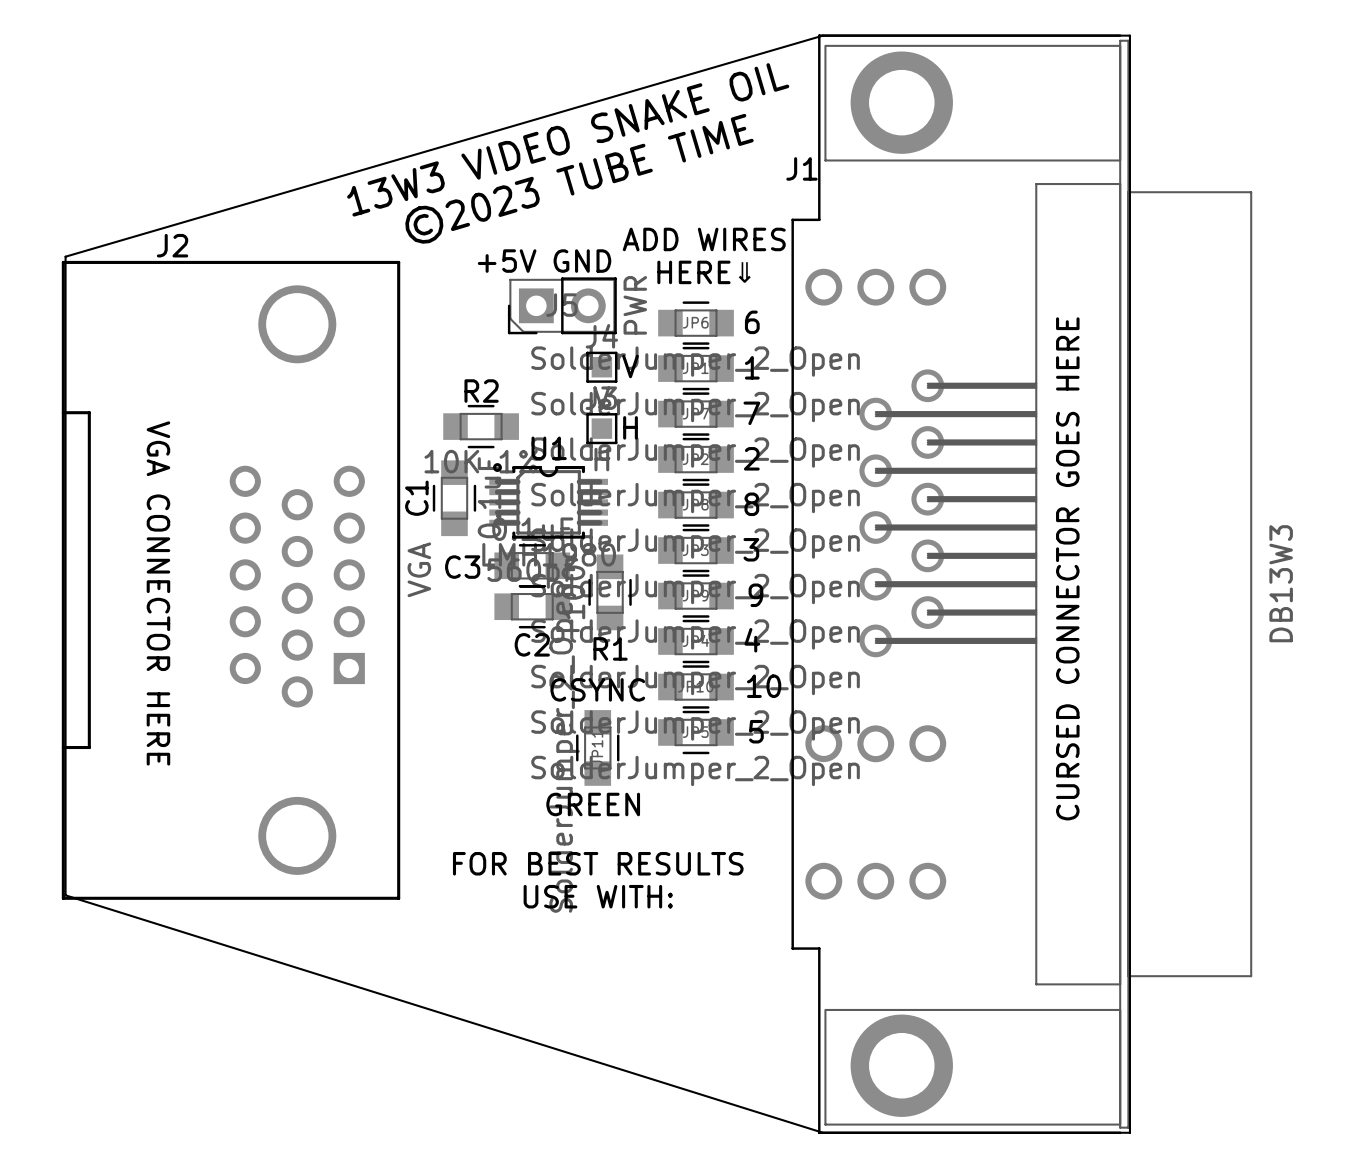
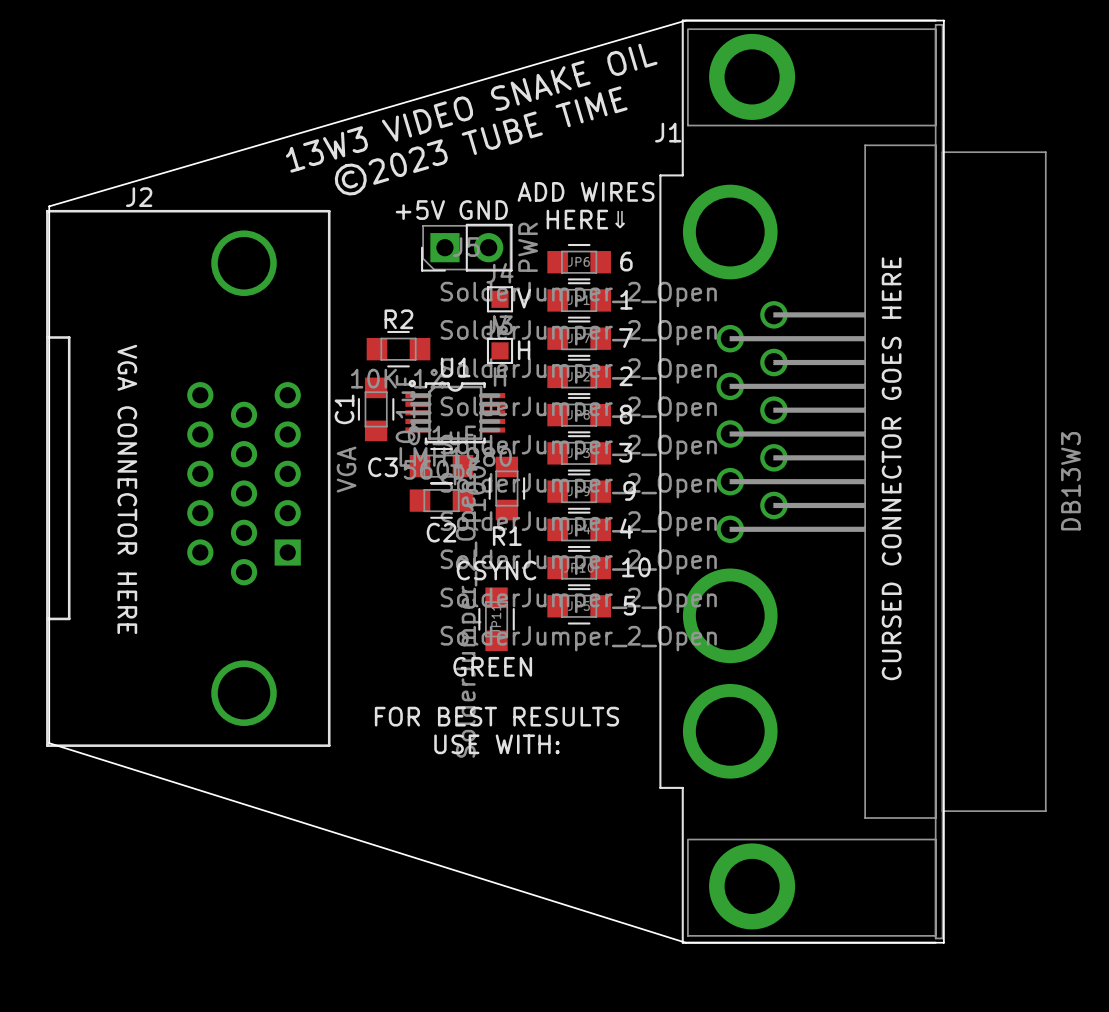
J1 footprint: [791, 34, 1253, 1135] -> [659, 19, 1047, 944]

